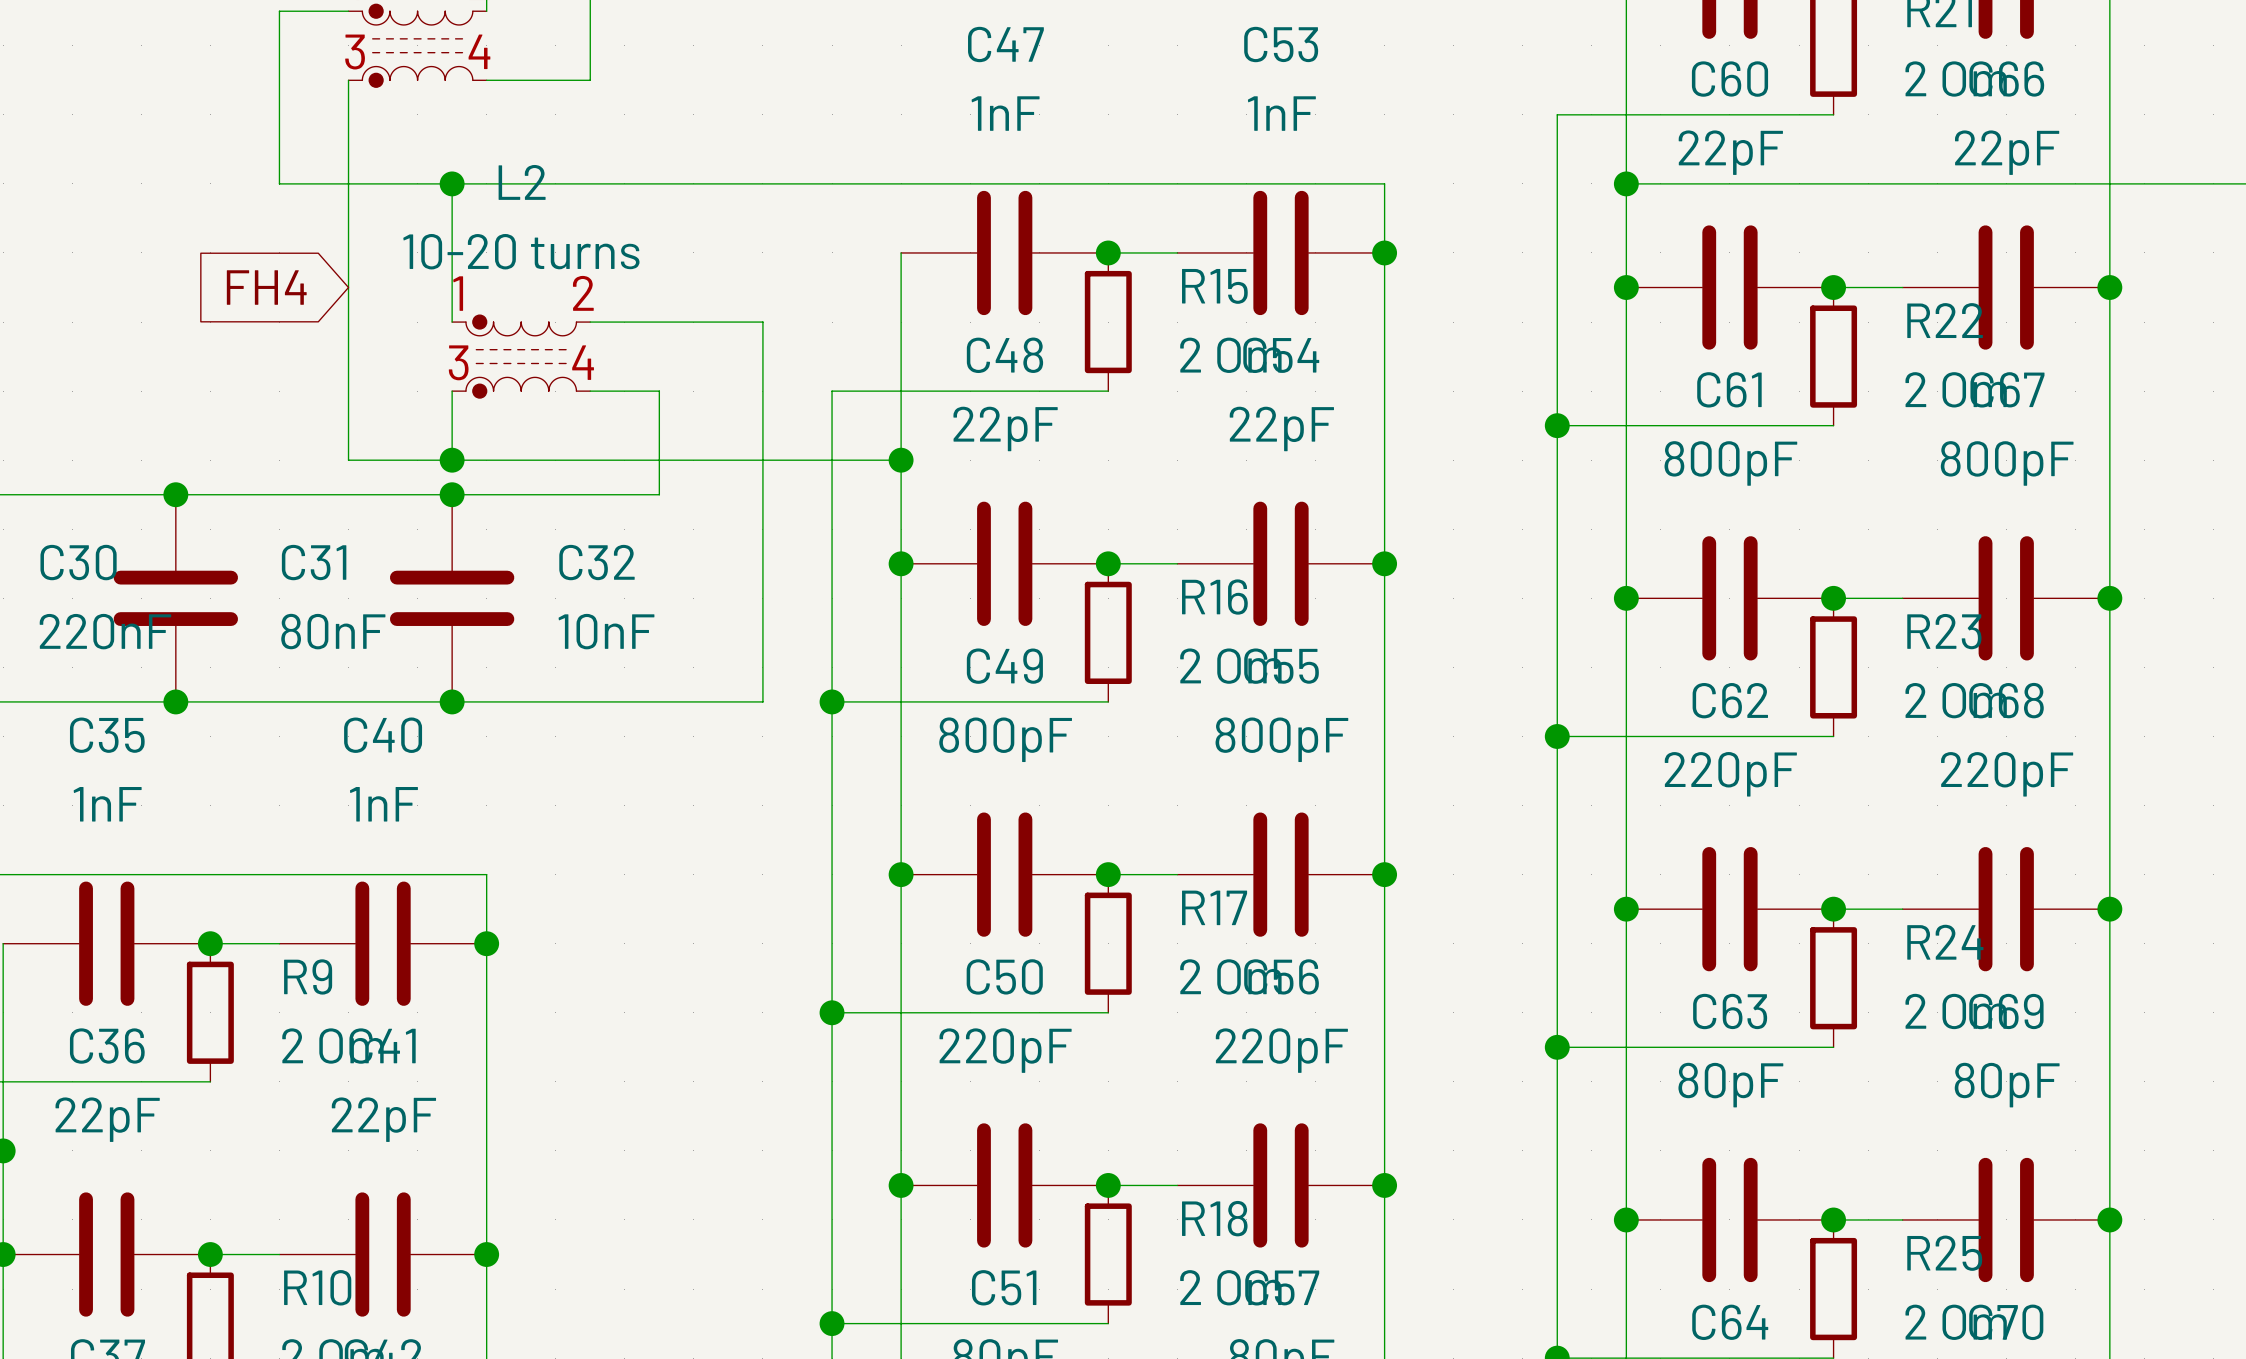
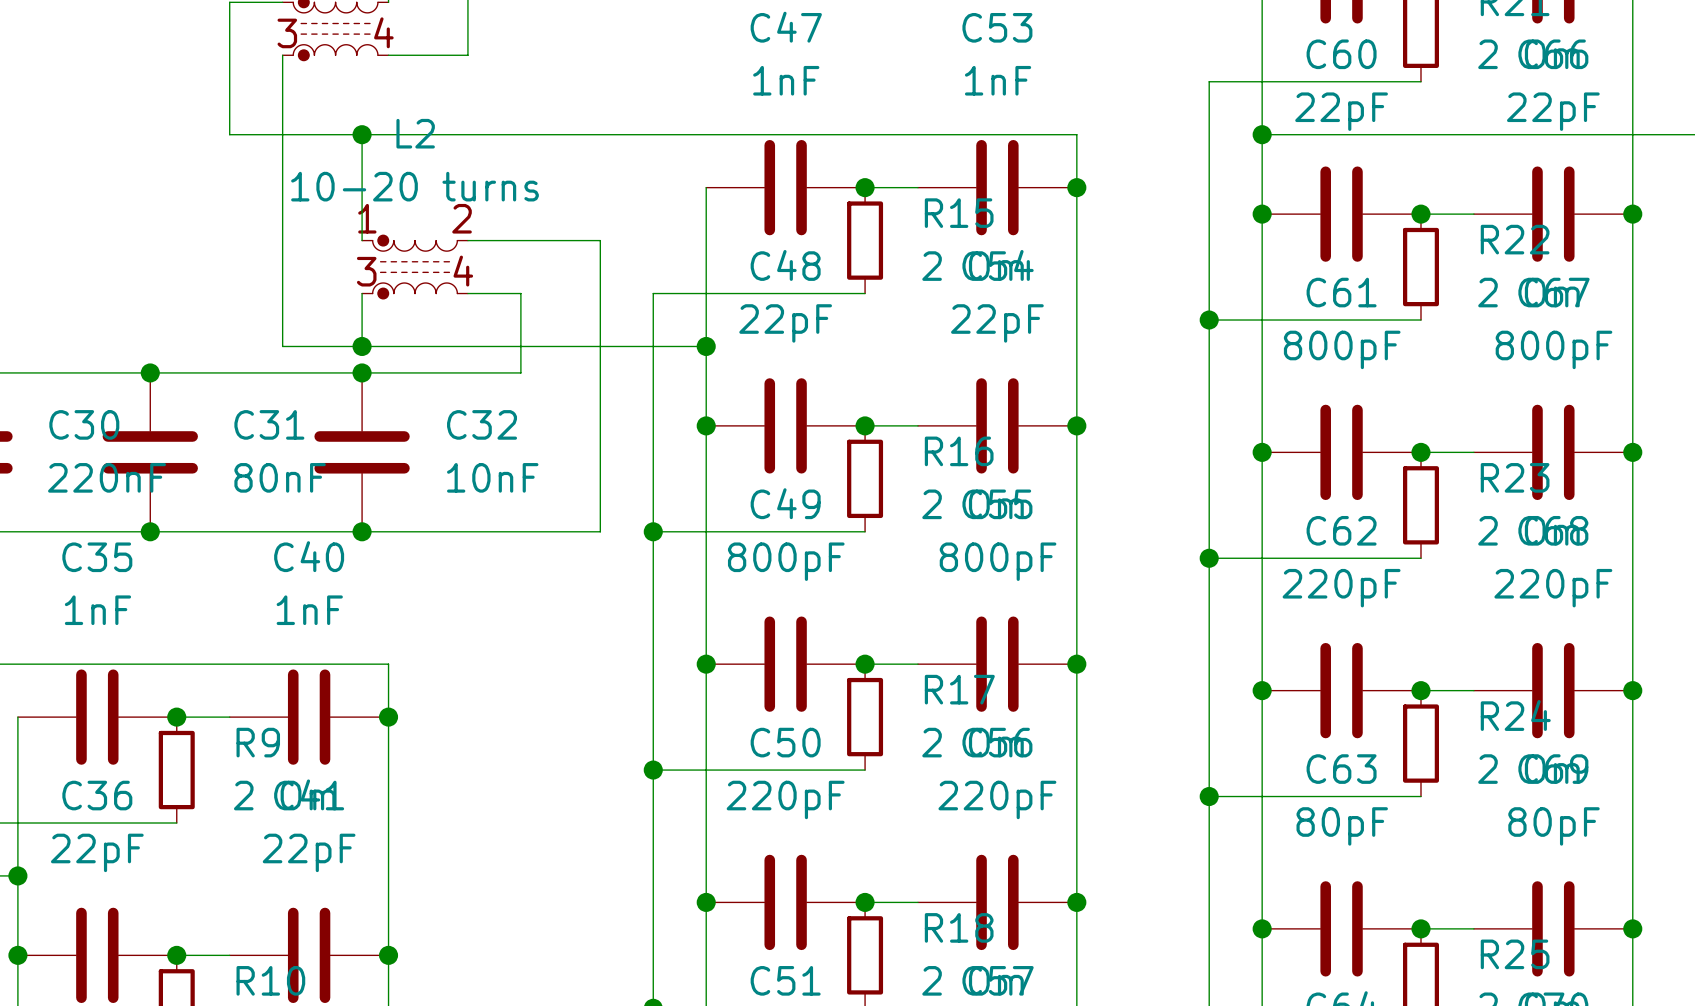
global label: FH4 (266, 287) -> none

